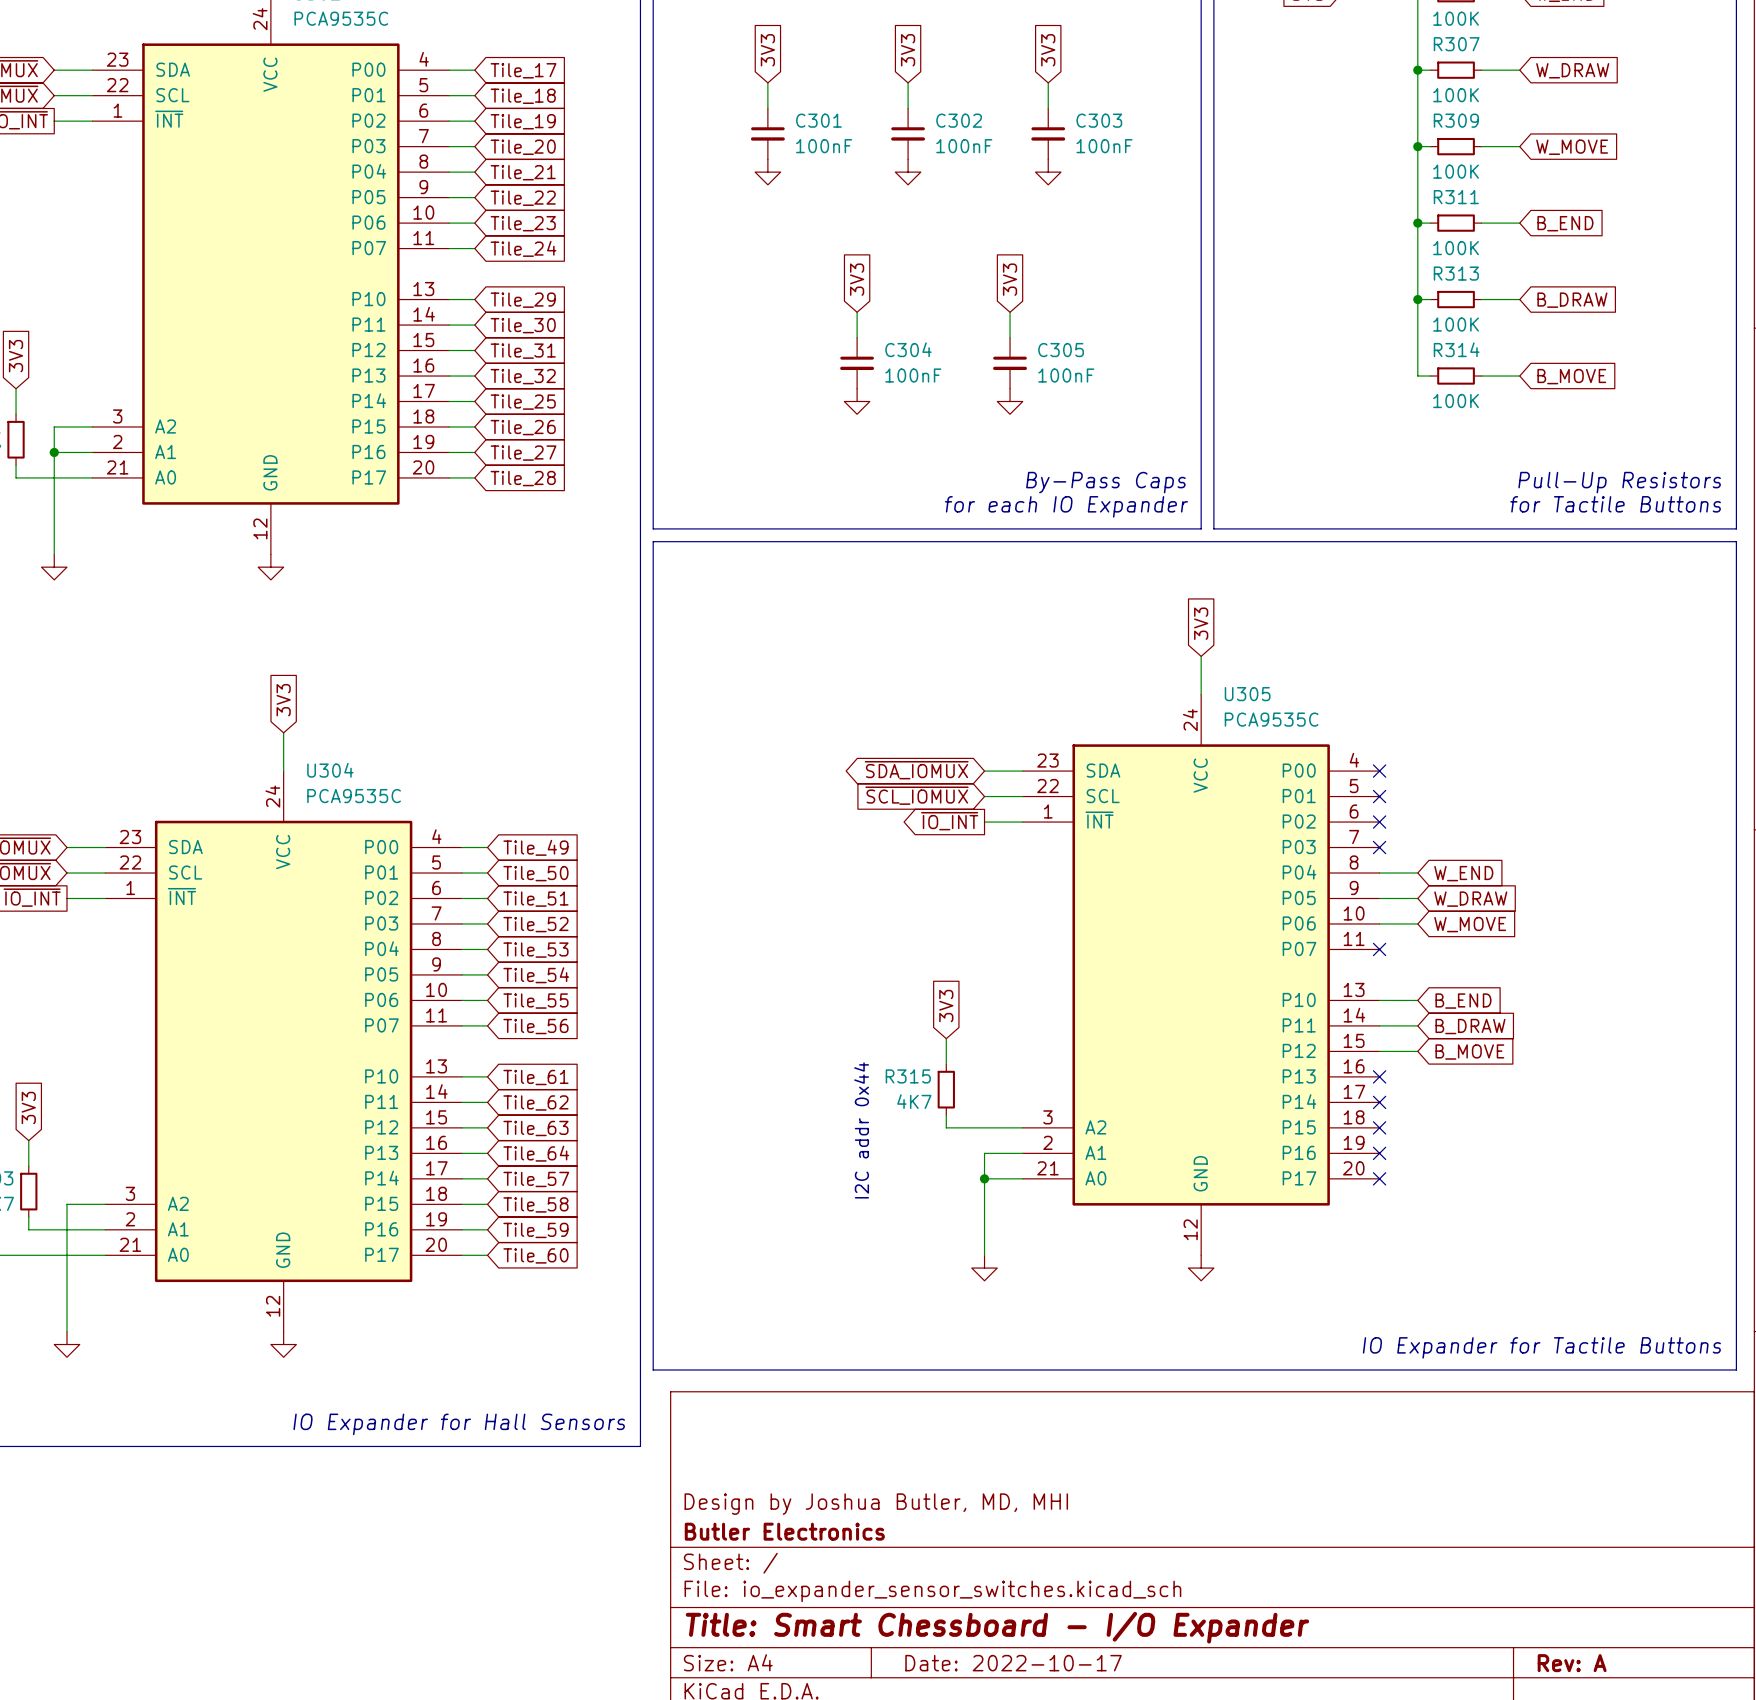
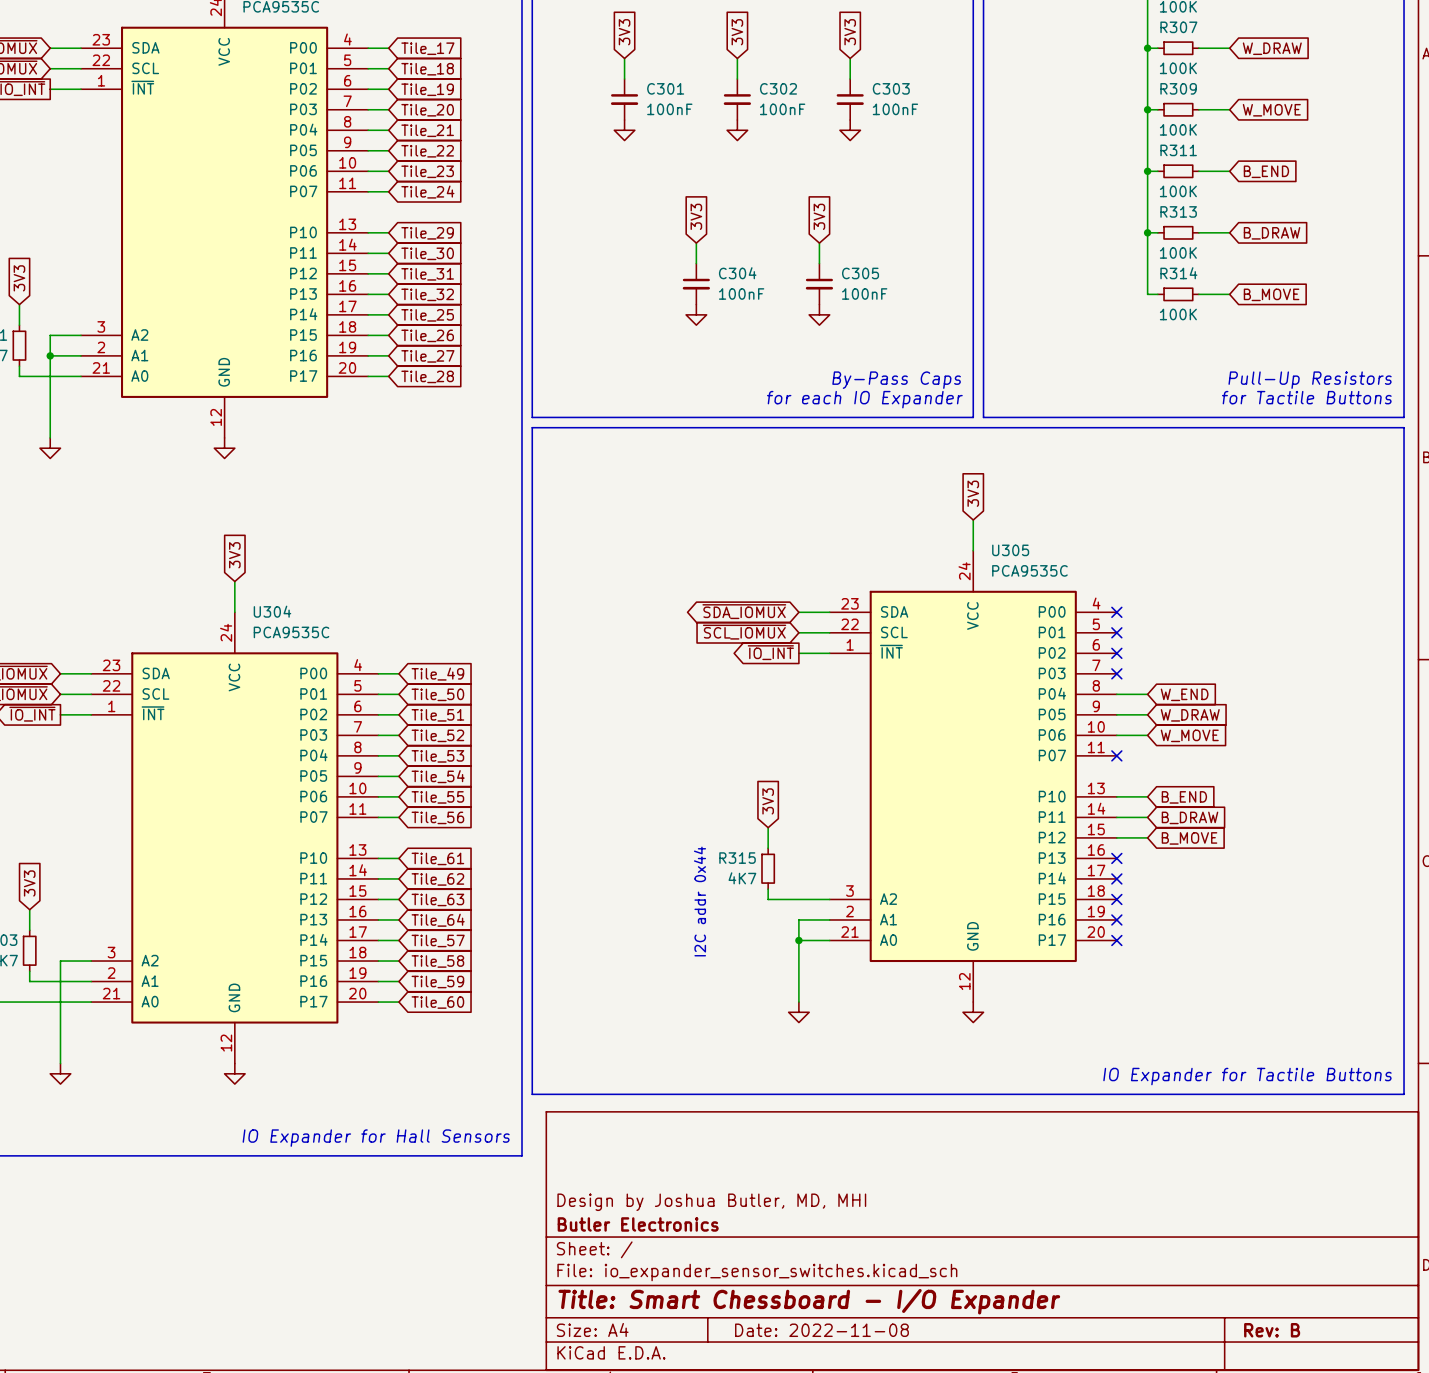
title block: Date: 2022-10-17 (1013, 1663) -> Date: 2022-11-08 (821, 1330)
title block: Rev: A (1572, 1663) -> Rev: B (1272, 1330)

